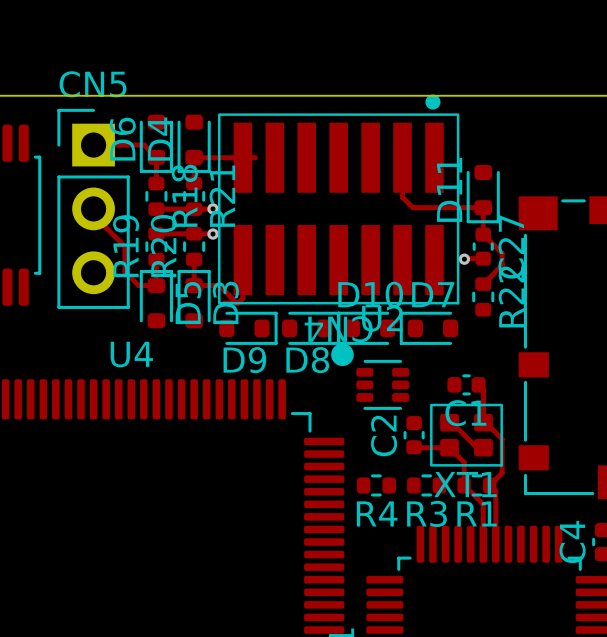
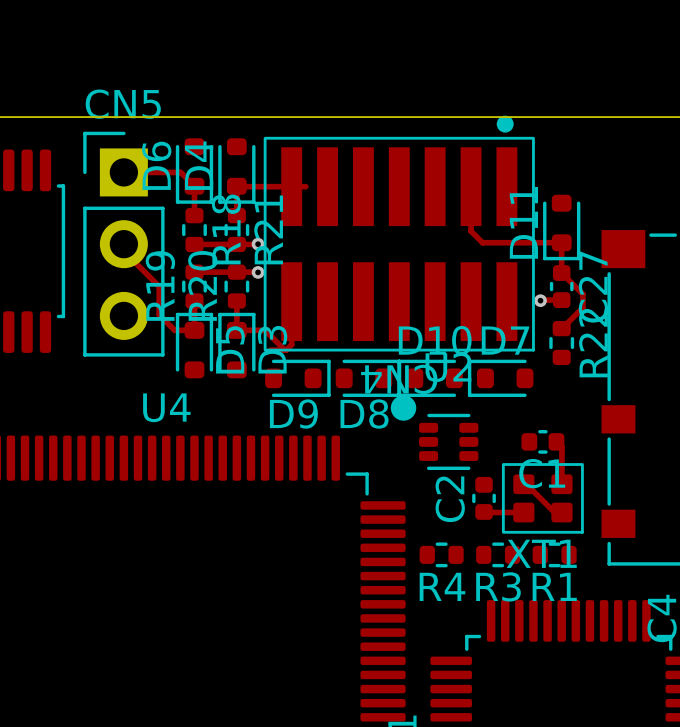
track: (483, 422) (485, 422) (502, 438) (502, 473) (489, 485) (495, 491) (495, 544) -> none
track: (449, 447) (464, 462) (464, 485) -> none
track: (464, 485) (483, 504) (483, 544) -> none

